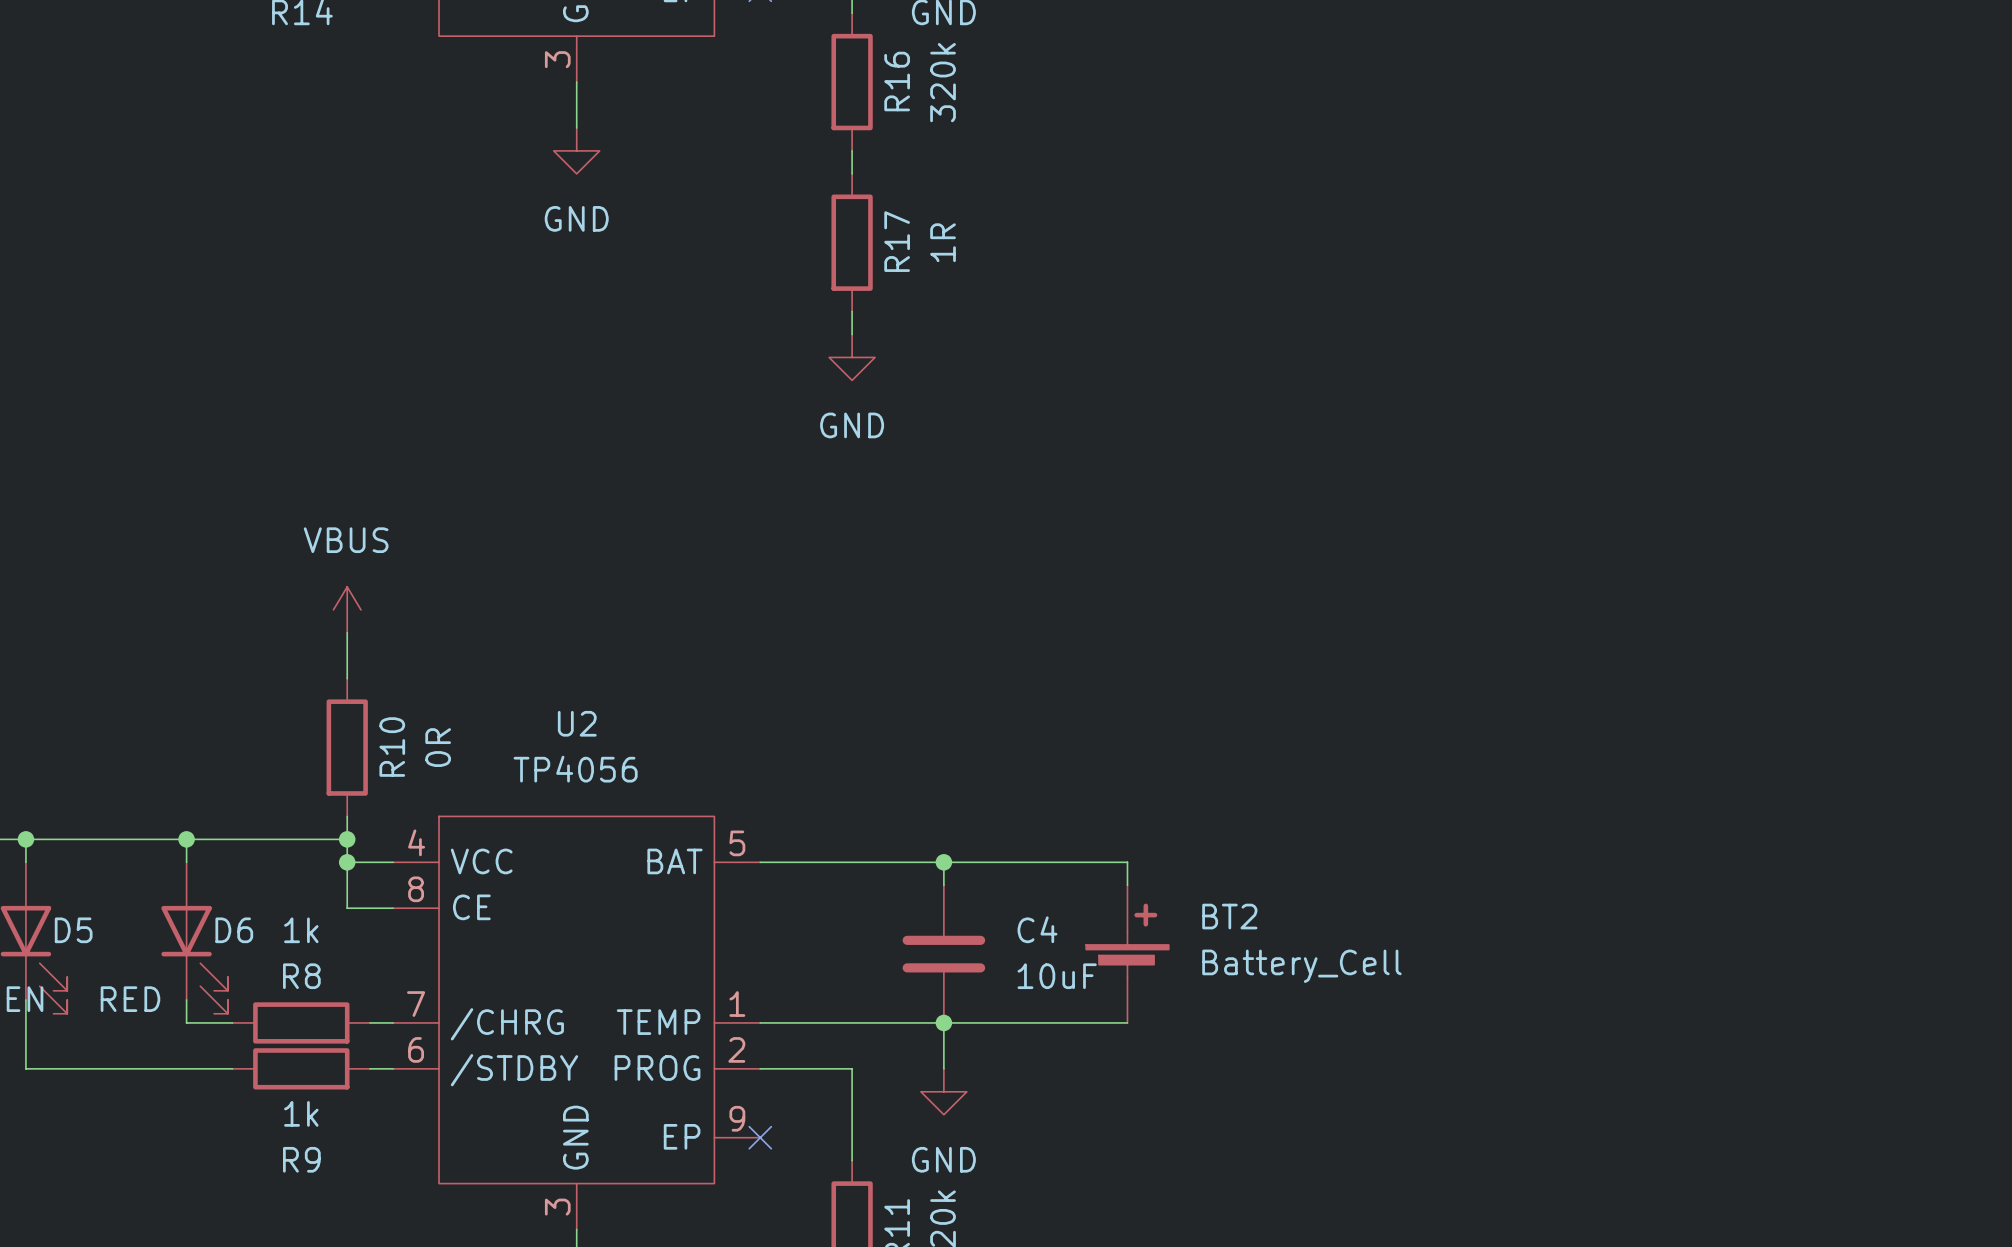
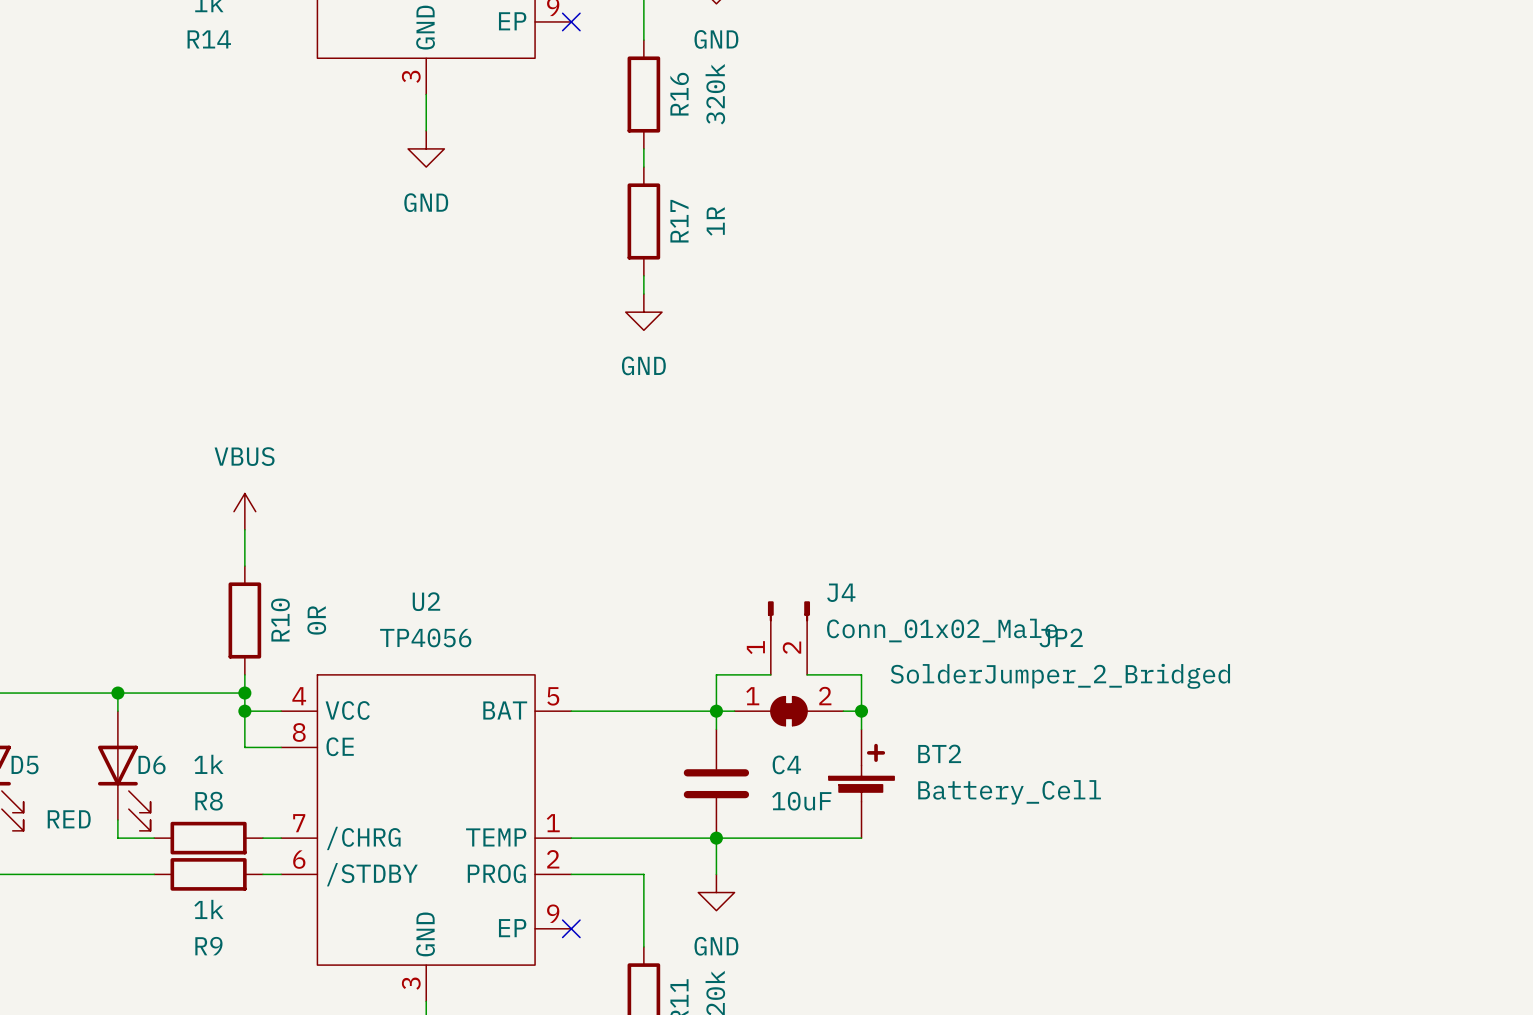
J4: none -> Conn_01x02_Male (788, 638)
wire: none -> (770, 674) (716, 674) (716, 711)
wire: none -> (807, 674) (861, 674) (861, 711)
JP2: none -> SolderJumper_2_Bridged (788, 711)
junction: none -> (861, 711)

